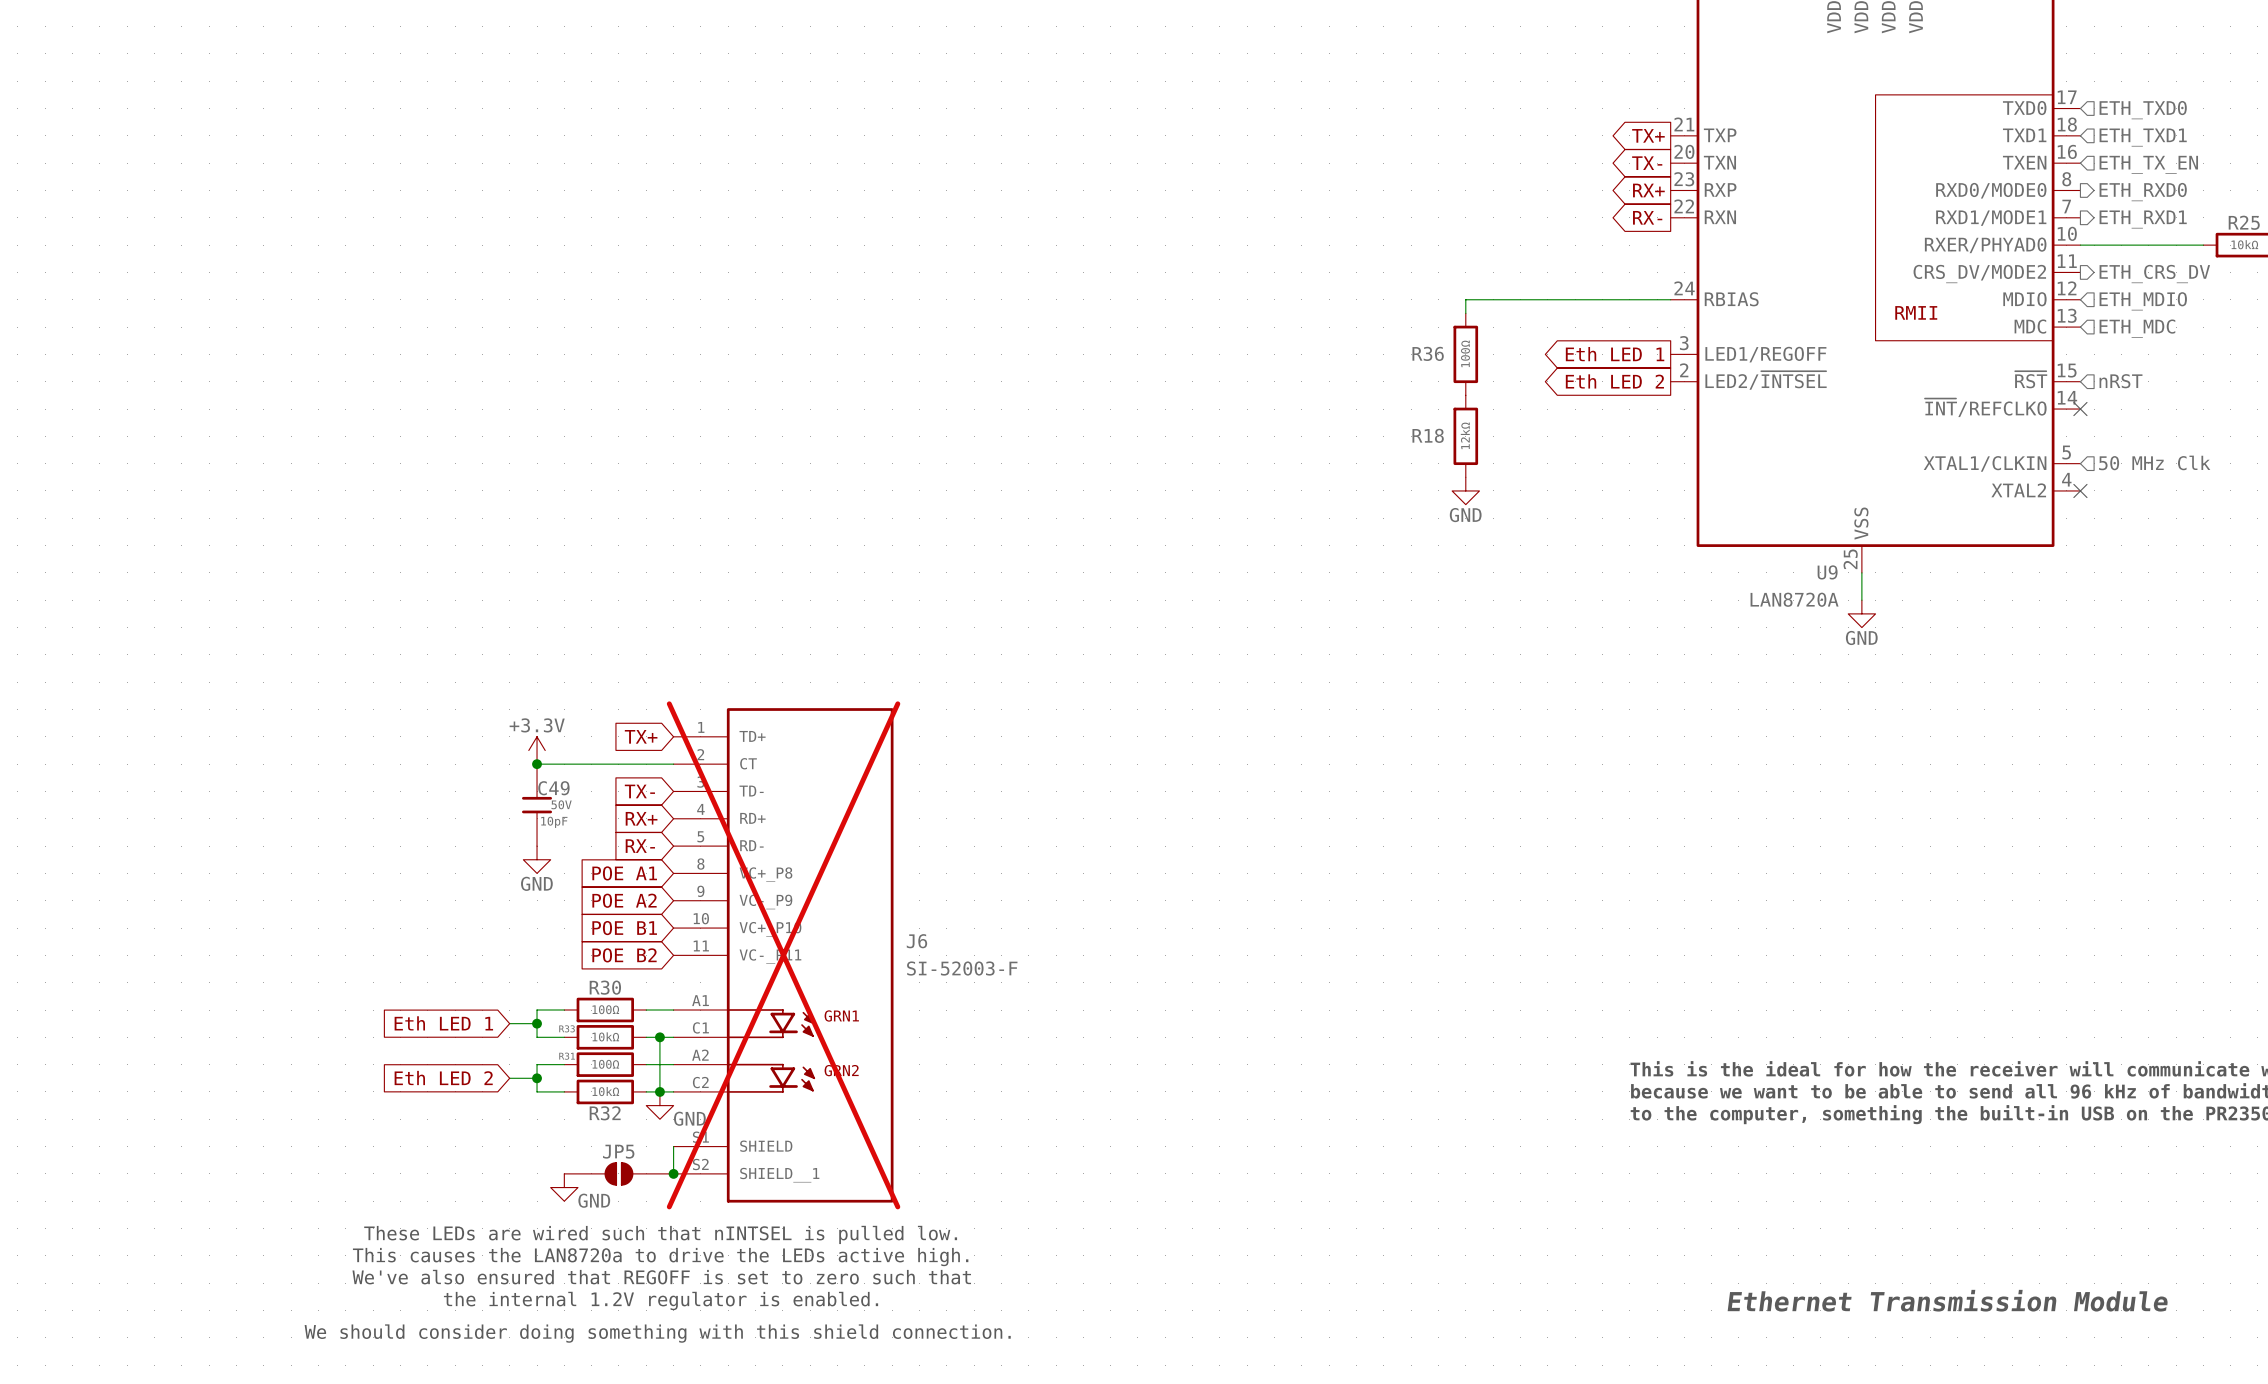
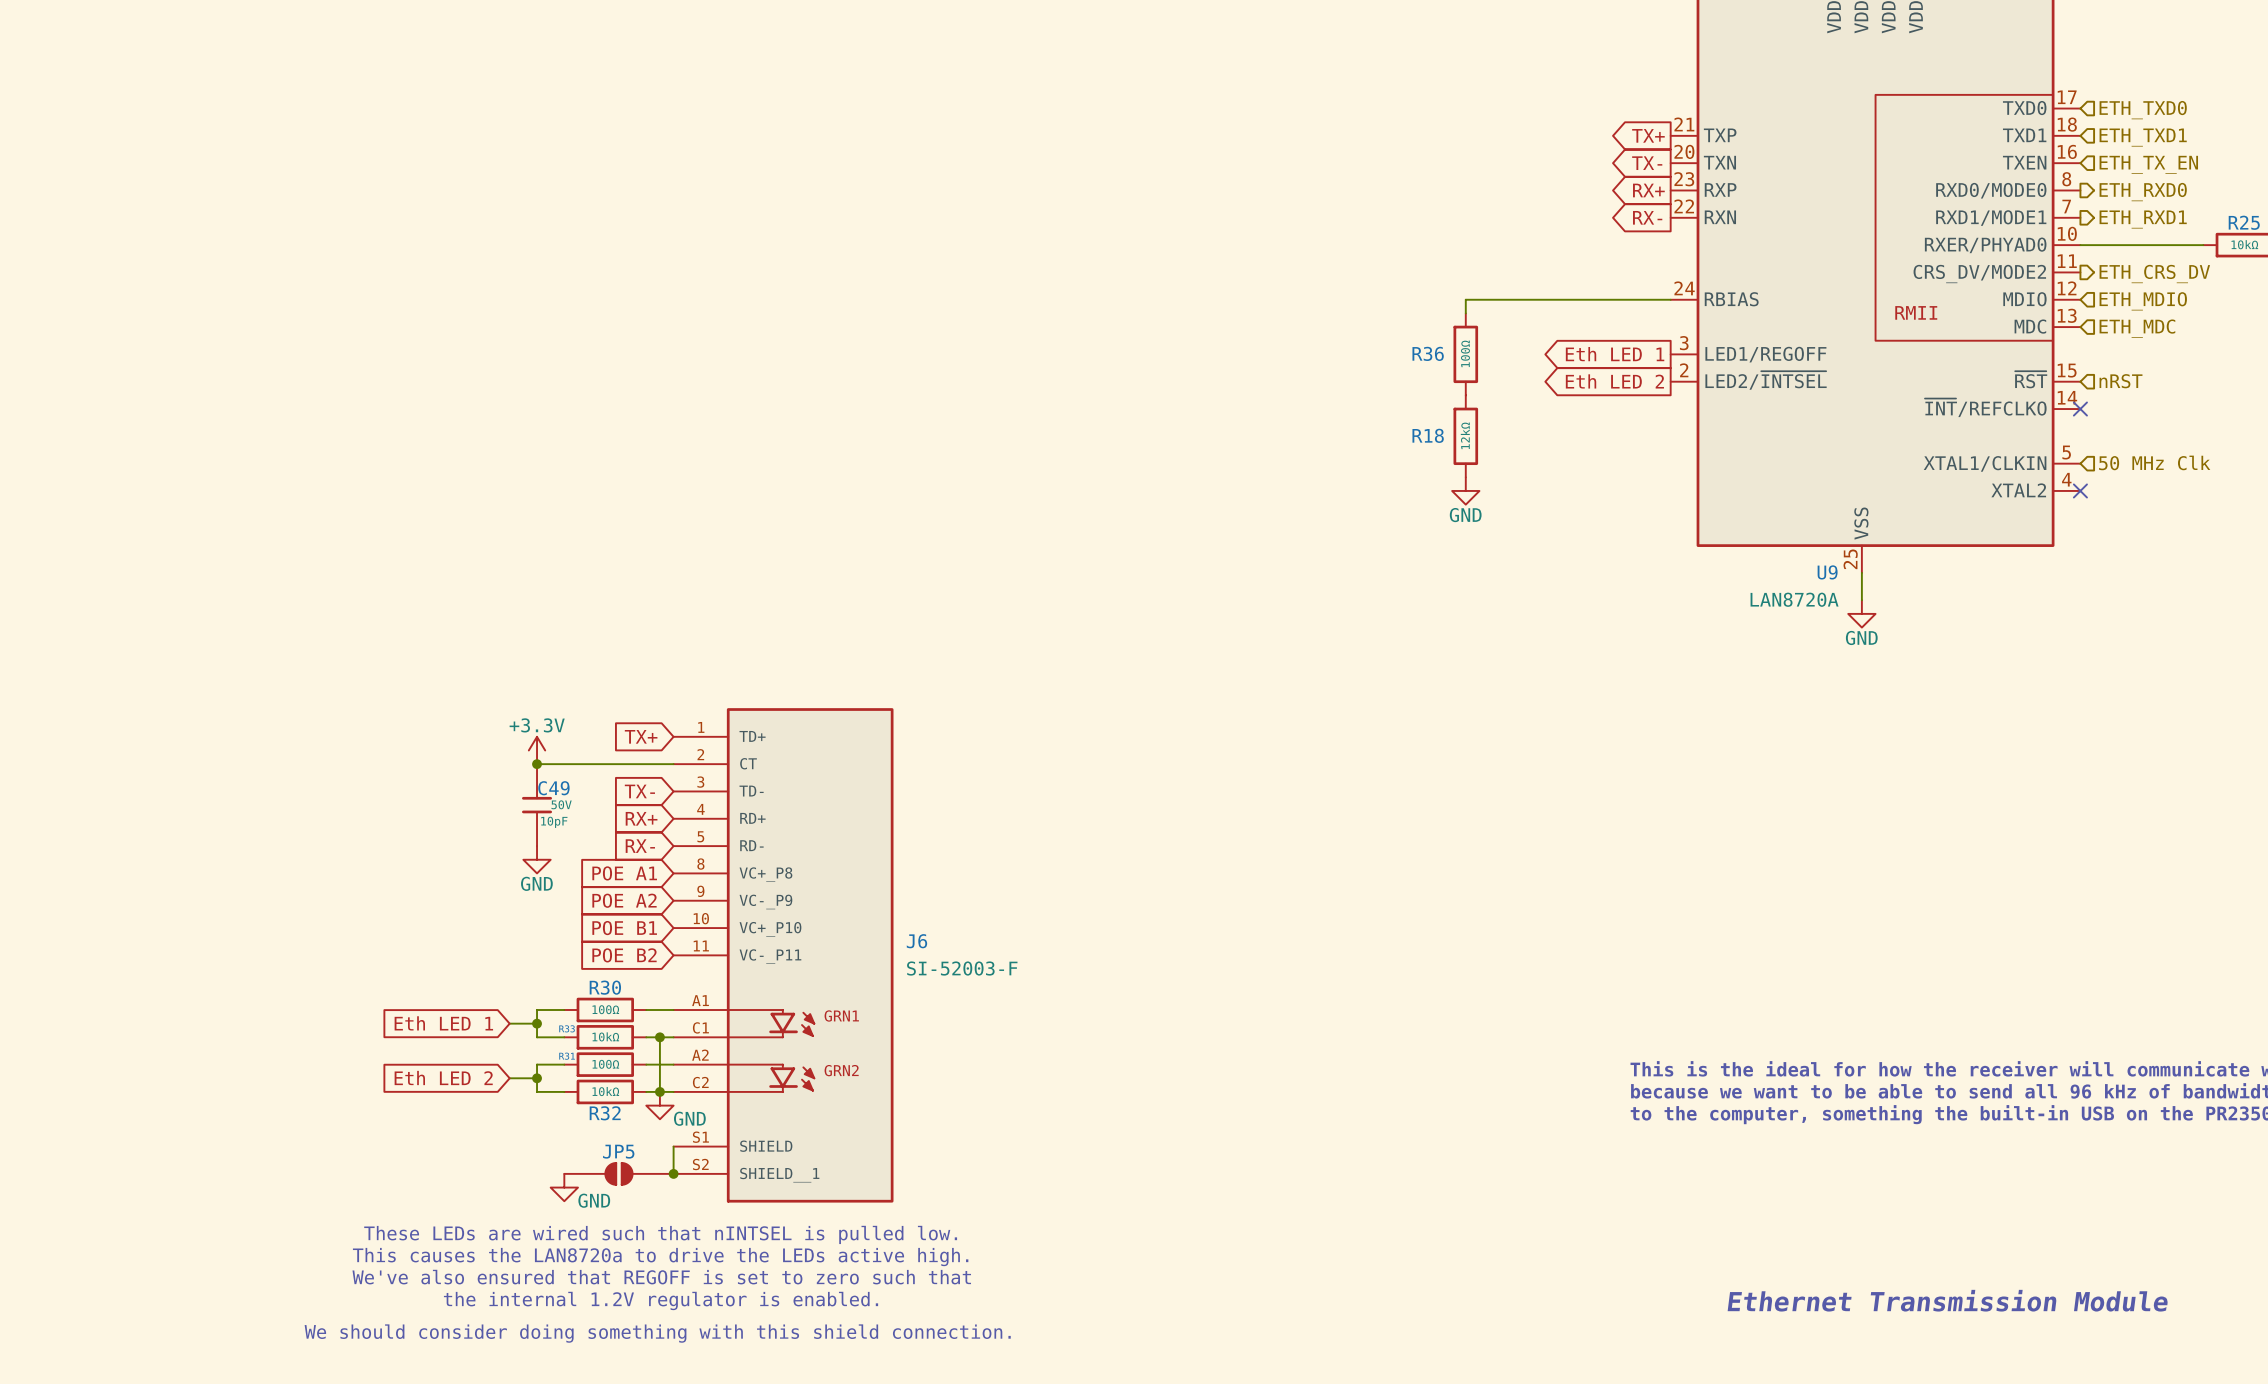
J6 do-not-place cross: (783, 955) -> none

